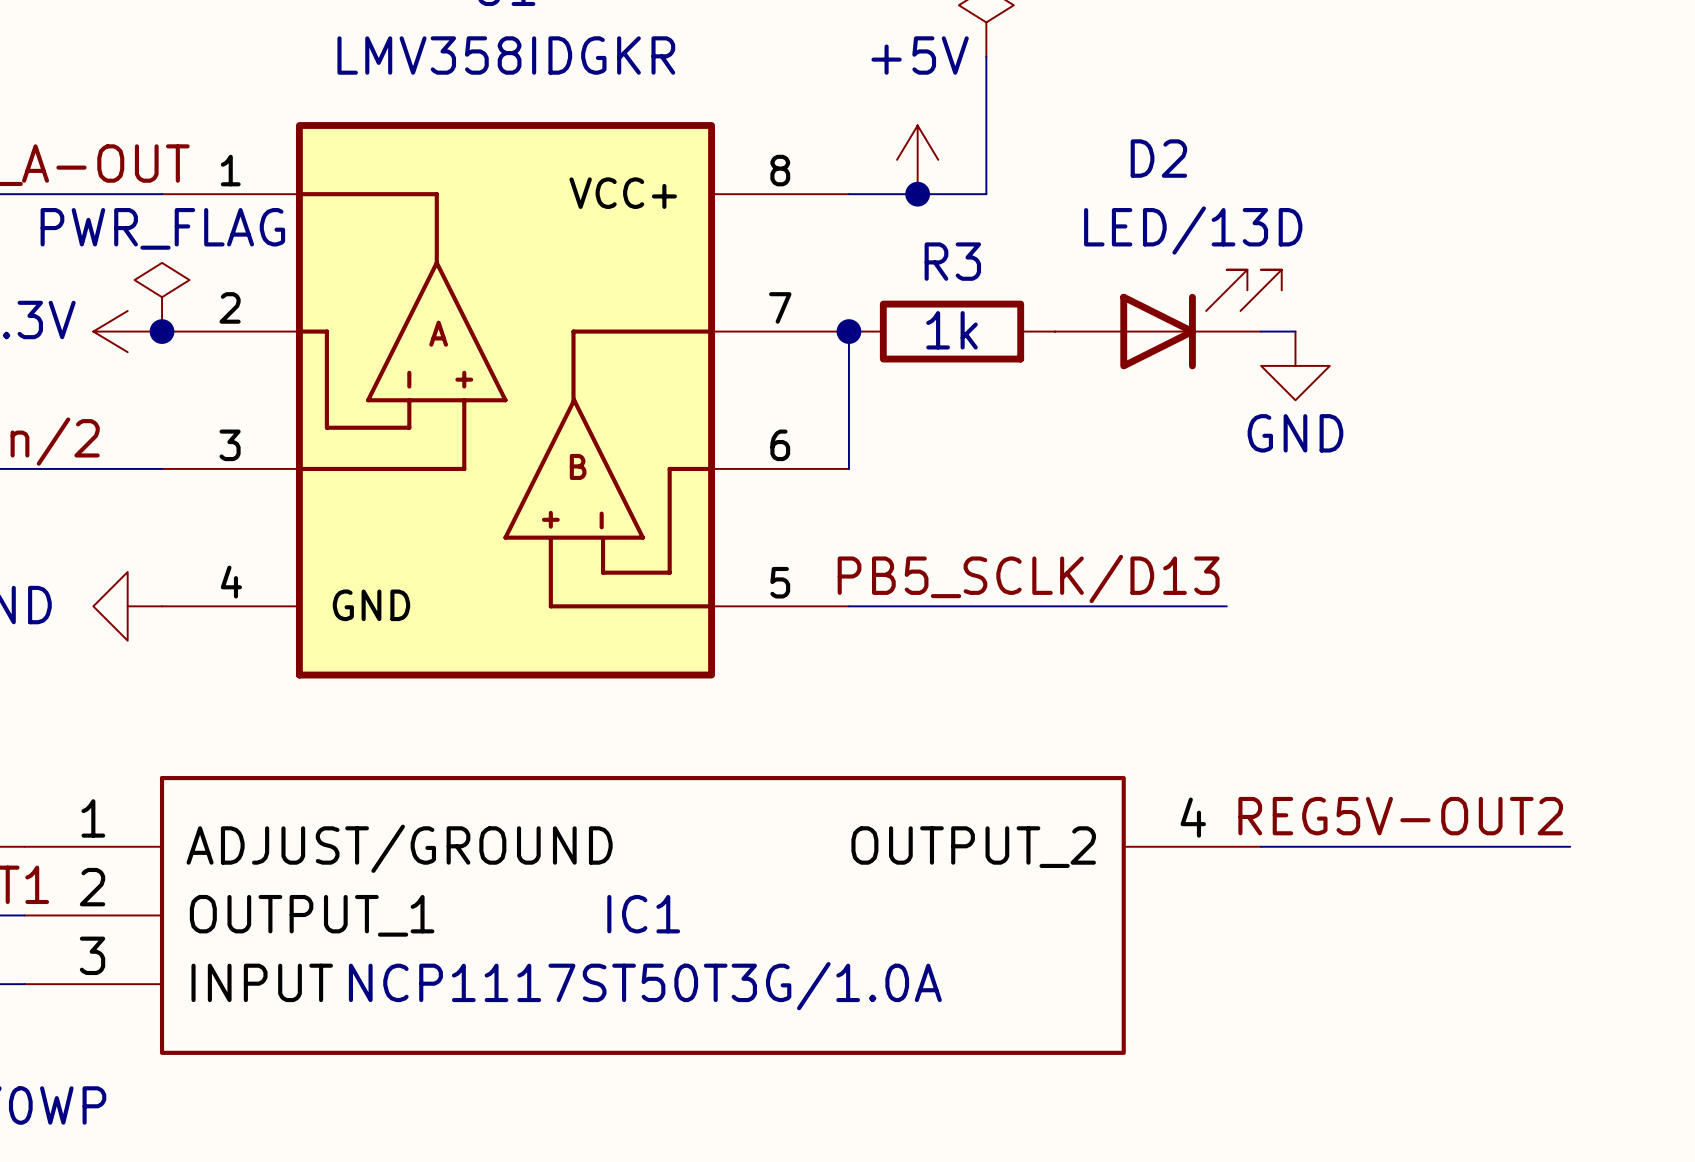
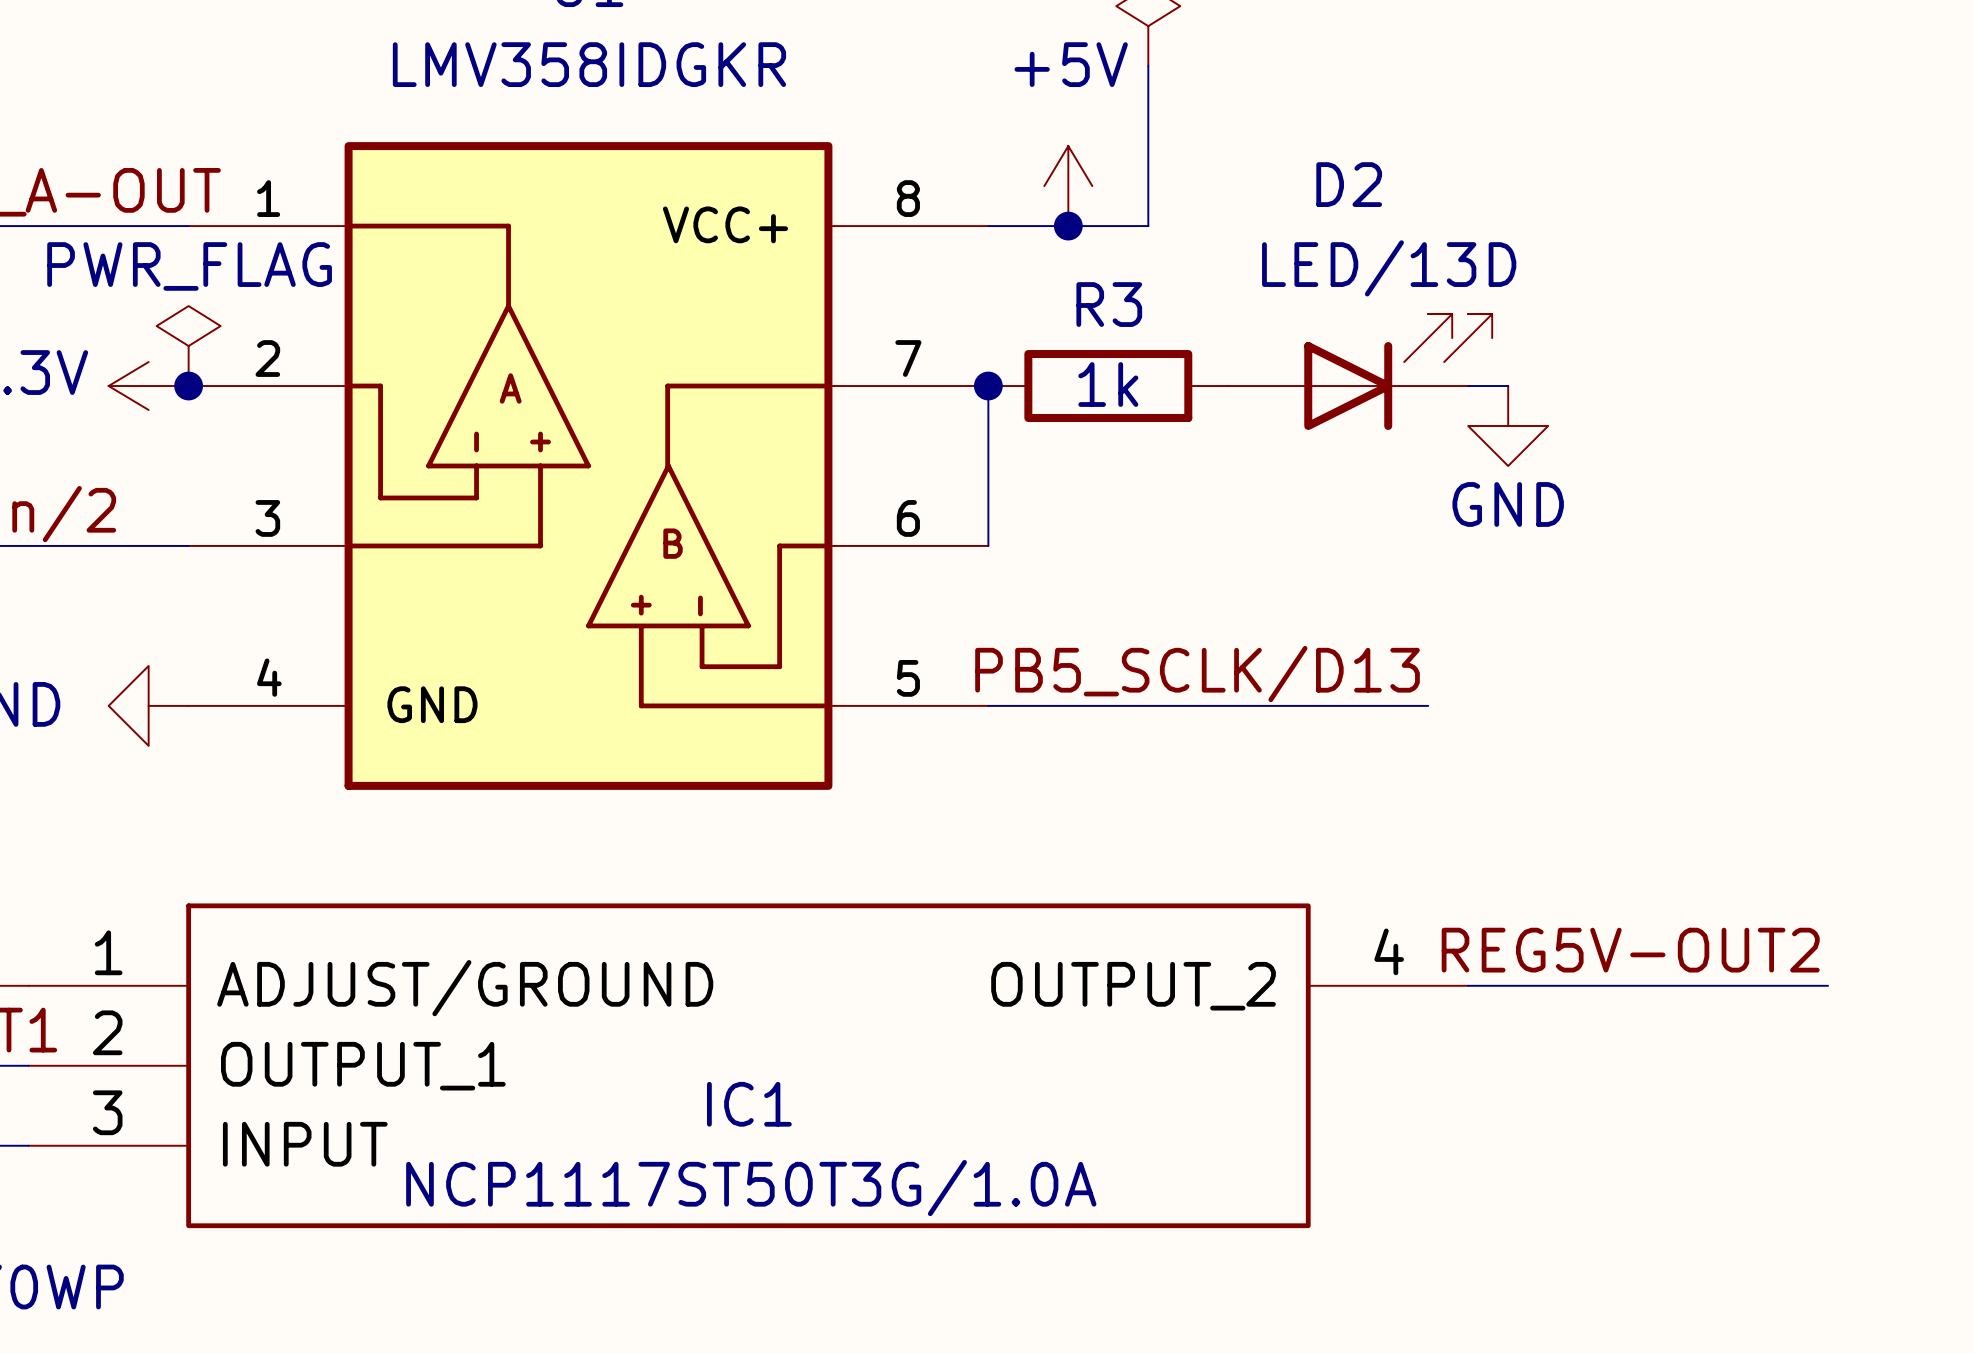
IC1 name position: IC1 (643, 914) -> IC1 (749, 1104)
IC1 value position: NCP1117ST50T3G/1.0A (645, 986) -> NCP1117ST50T3G/1.0A (751, 1188)

